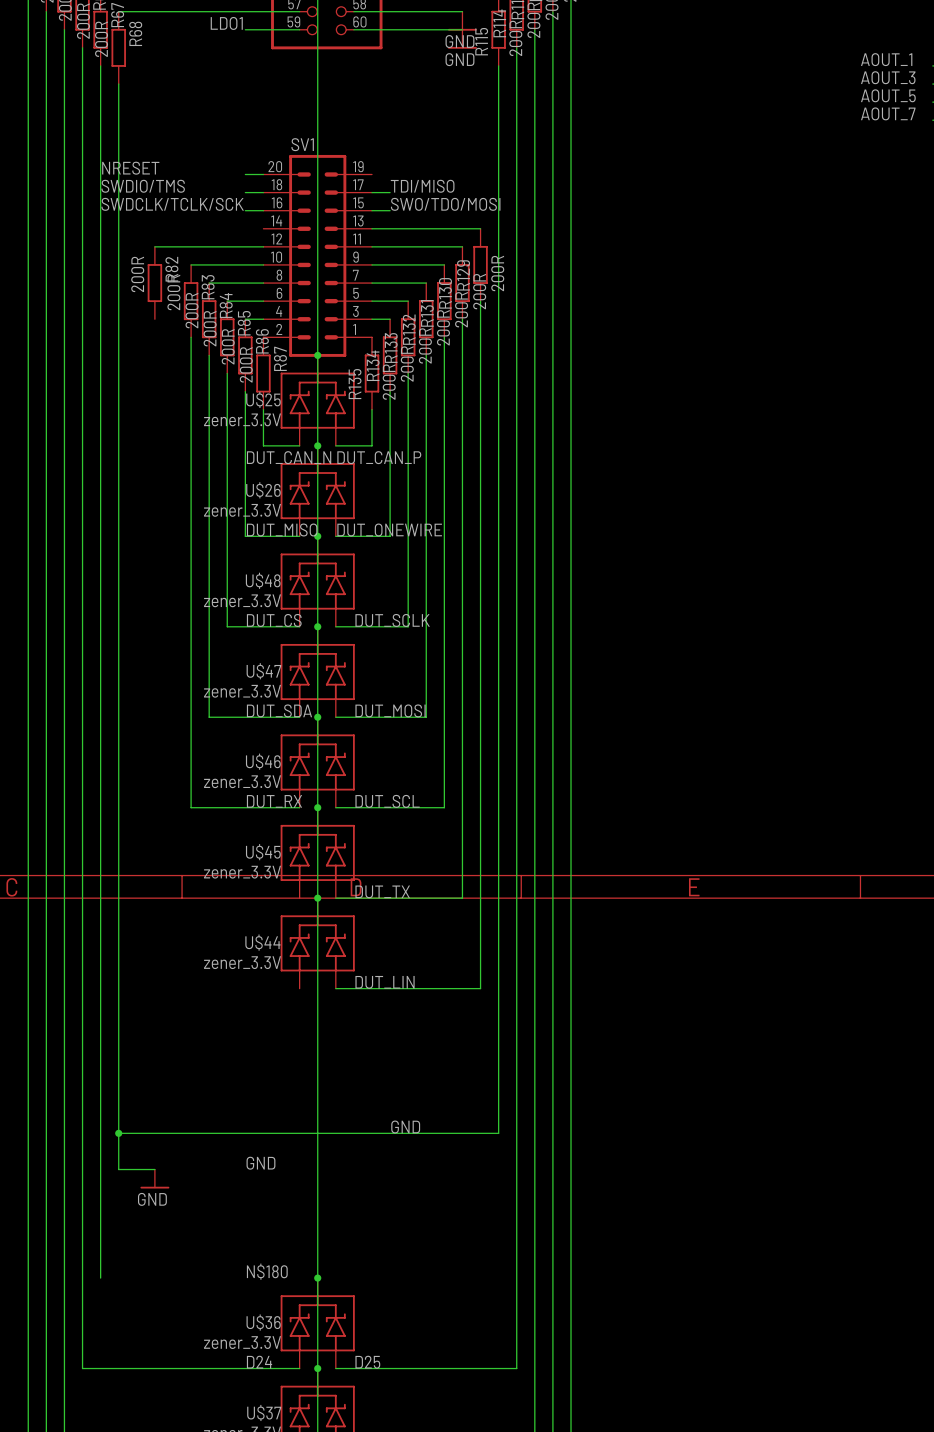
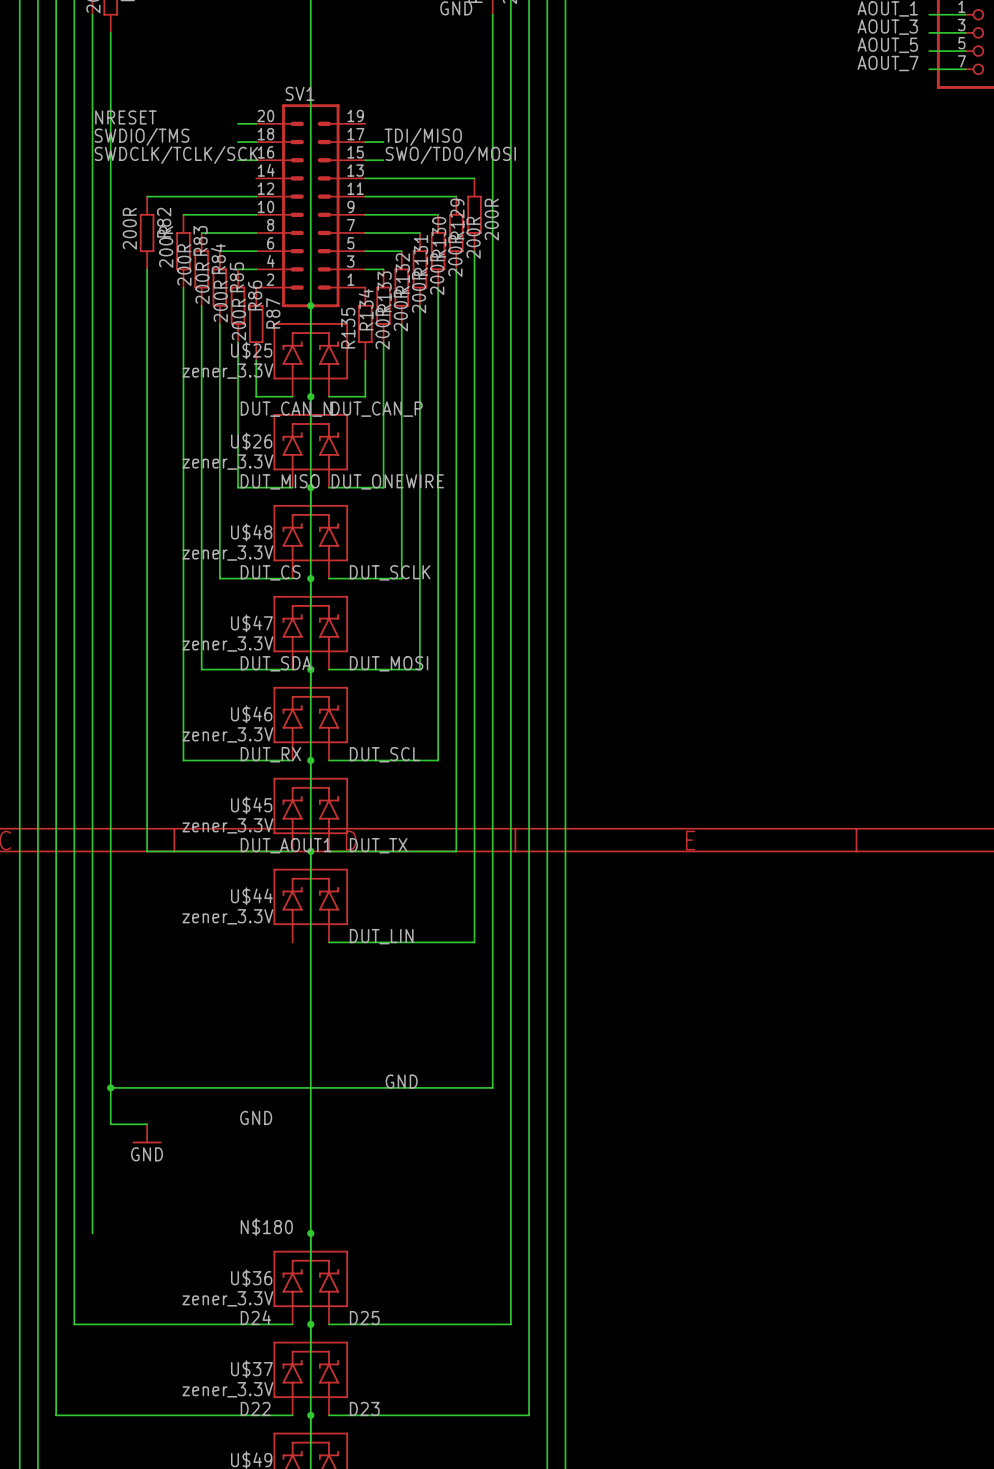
wire: none -> (147, 269) (147, 851) (292, 851)
label: none -> DUT_AOUT1 (286, 845)

